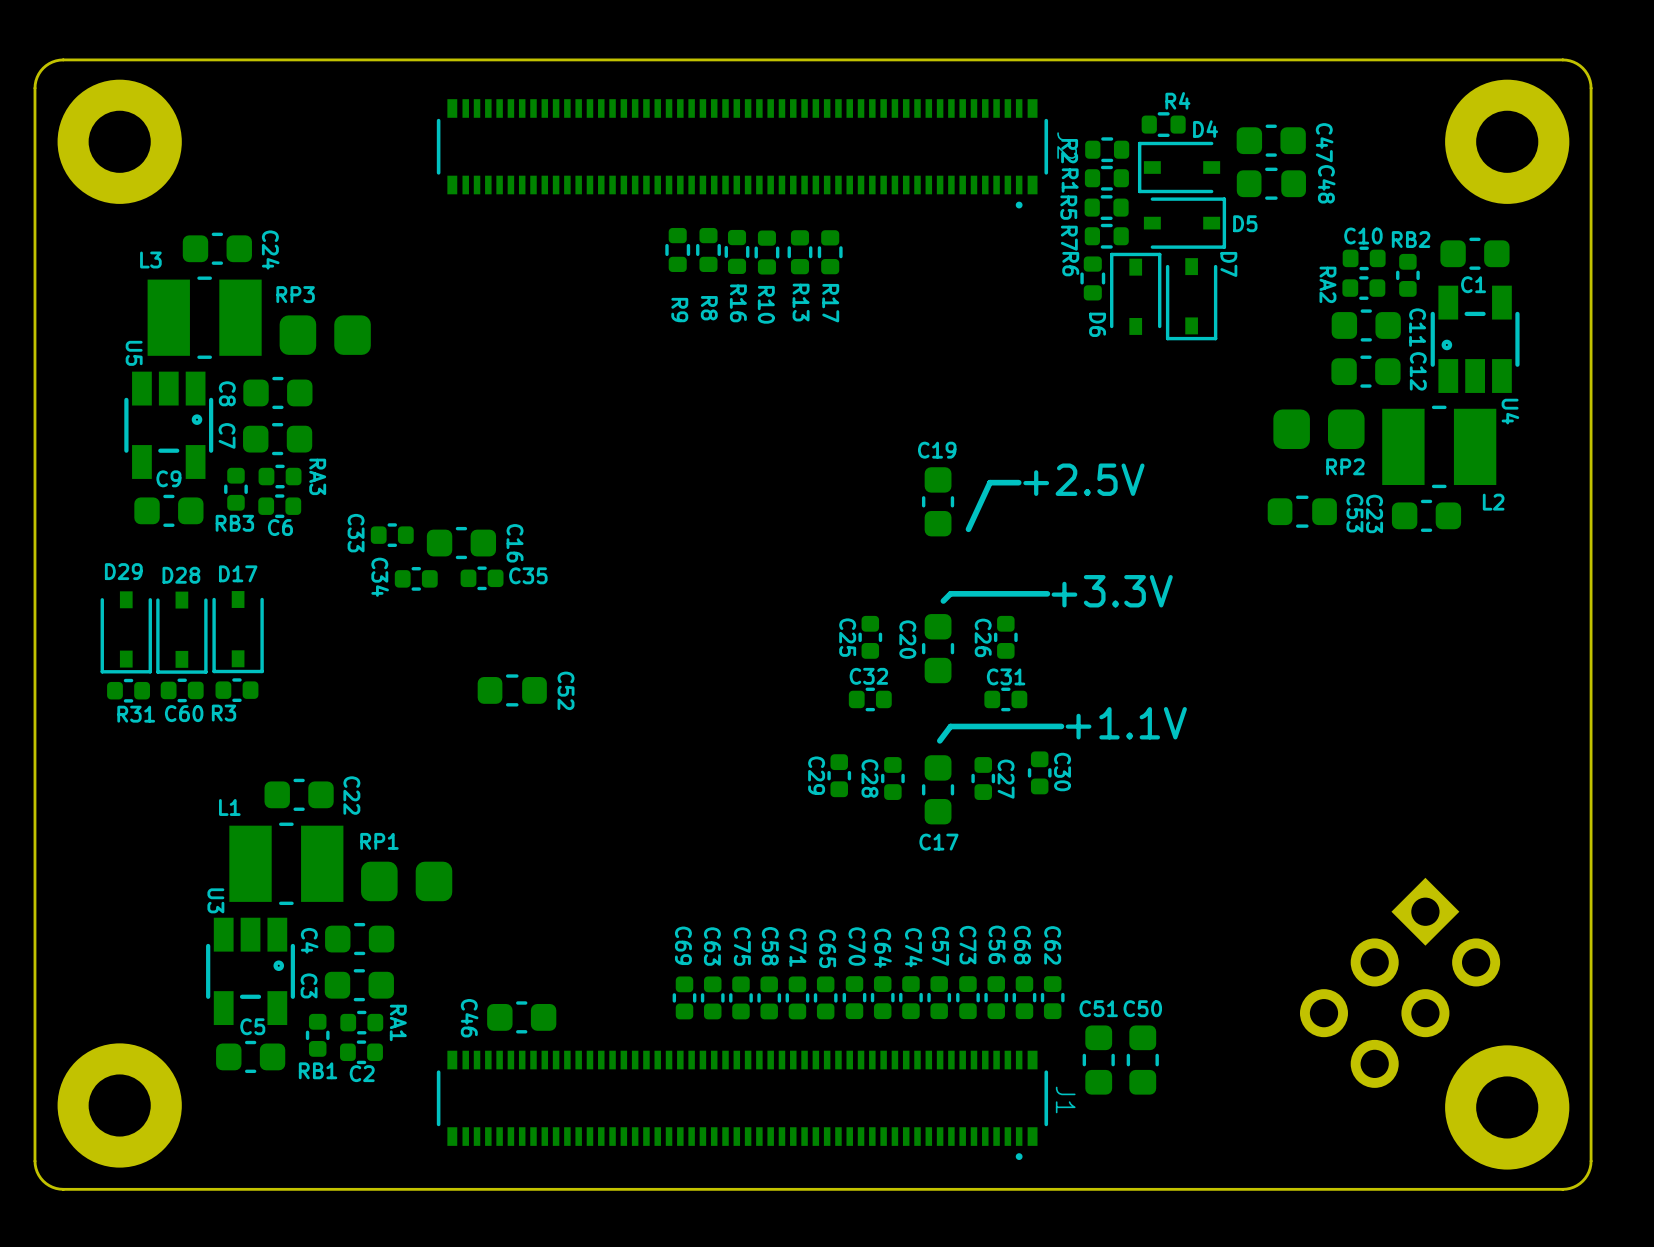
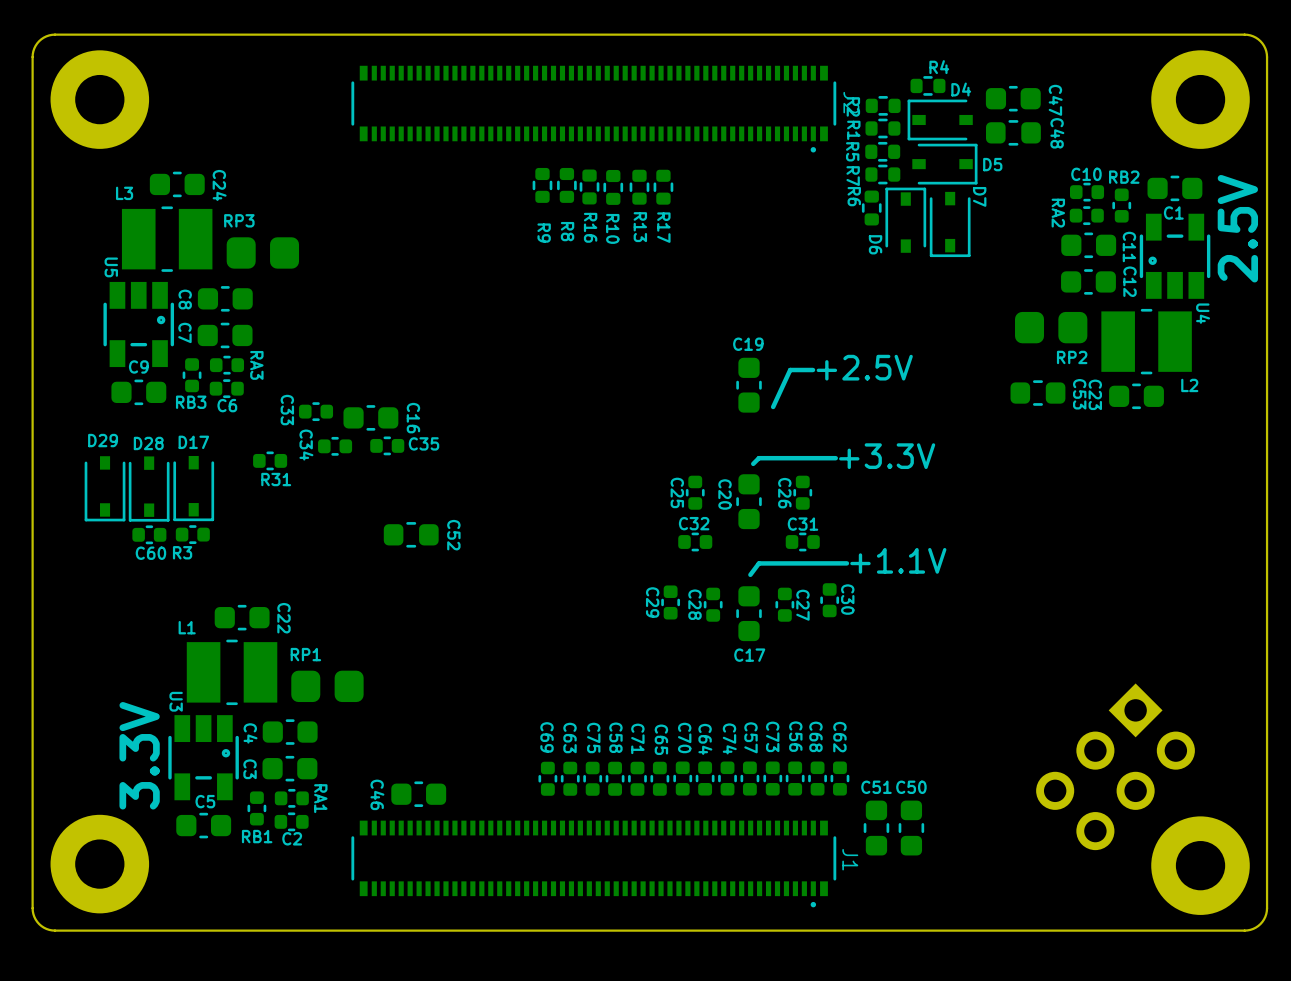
text: none -> 2.5V (1237, 228)
R31 position: (128, 690) -> (270, 460)
text: none -> 3.3V (139, 755)

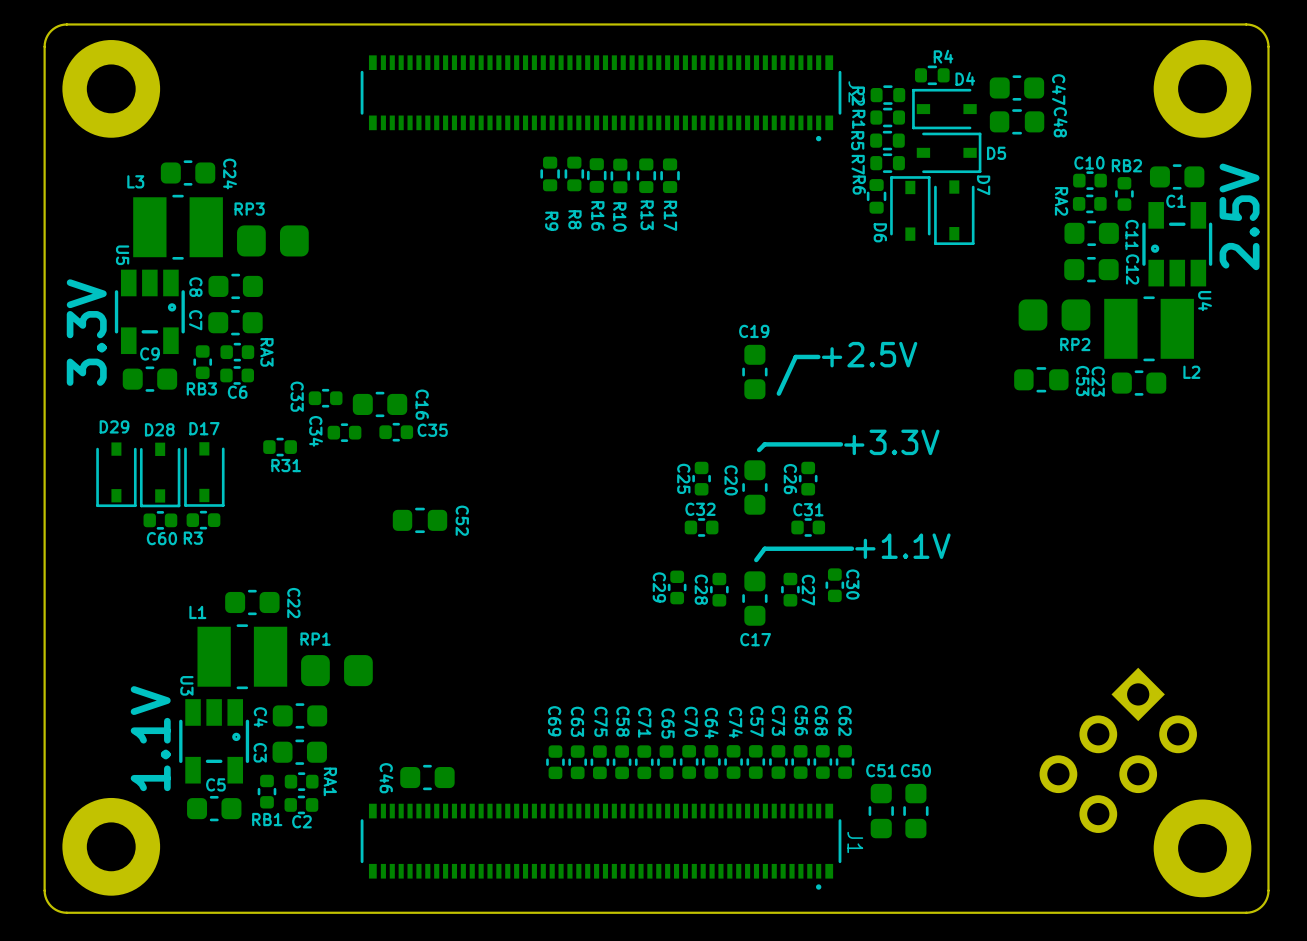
text: none -> 3.3V (86, 332)
text: 3.3V (139, 755) -> 1.1V (150, 738)

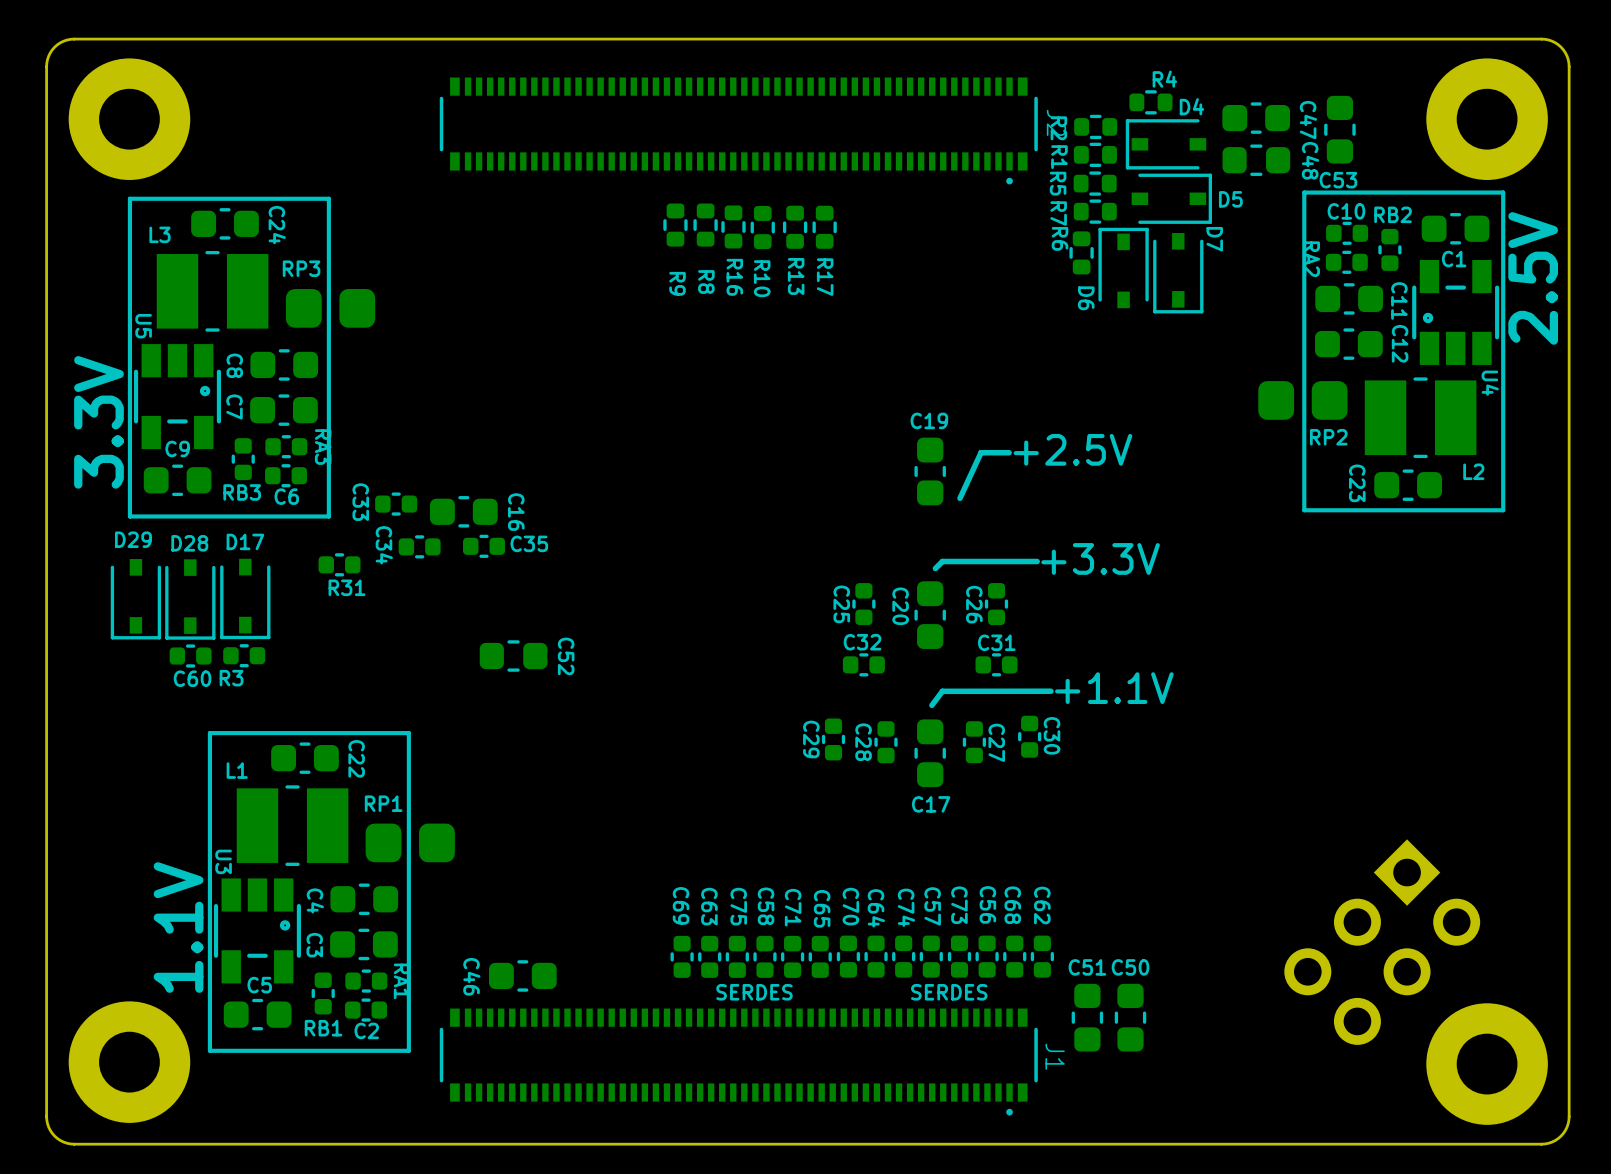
line: none -> (1503, 192) (1503, 510) (1304, 510) (1304, 192) (1503, 192)
line: none -> (328, 198) (328, 516) (129, 516) (129, 198) (328, 198)
C53 rotation: 0° (1041, 379) -> 90° clockwise (1339, 129)
C53 position: (1041, 379) -> (1339, 129)
line: none -> (408, 733) (408, 1050) (209, 1050) (209, 733) (408, 733)
text: none -> SERDES (754, 992)
text: none -> SERDES (949, 992)

